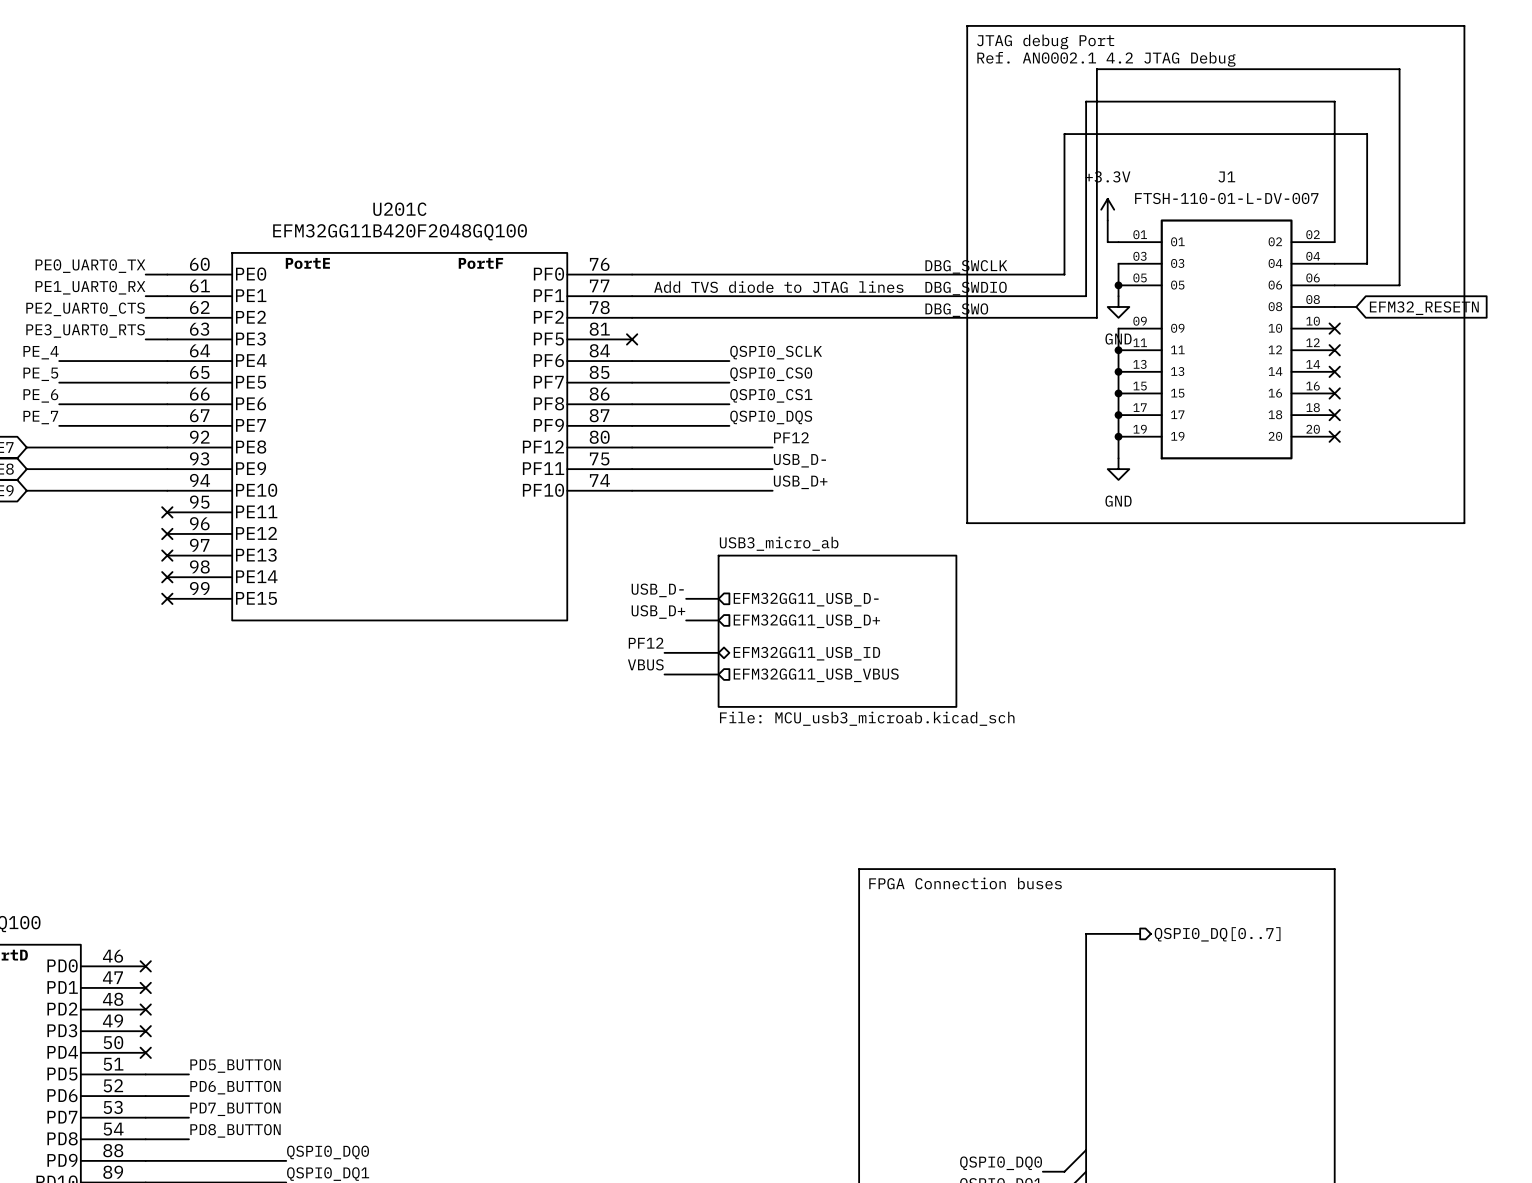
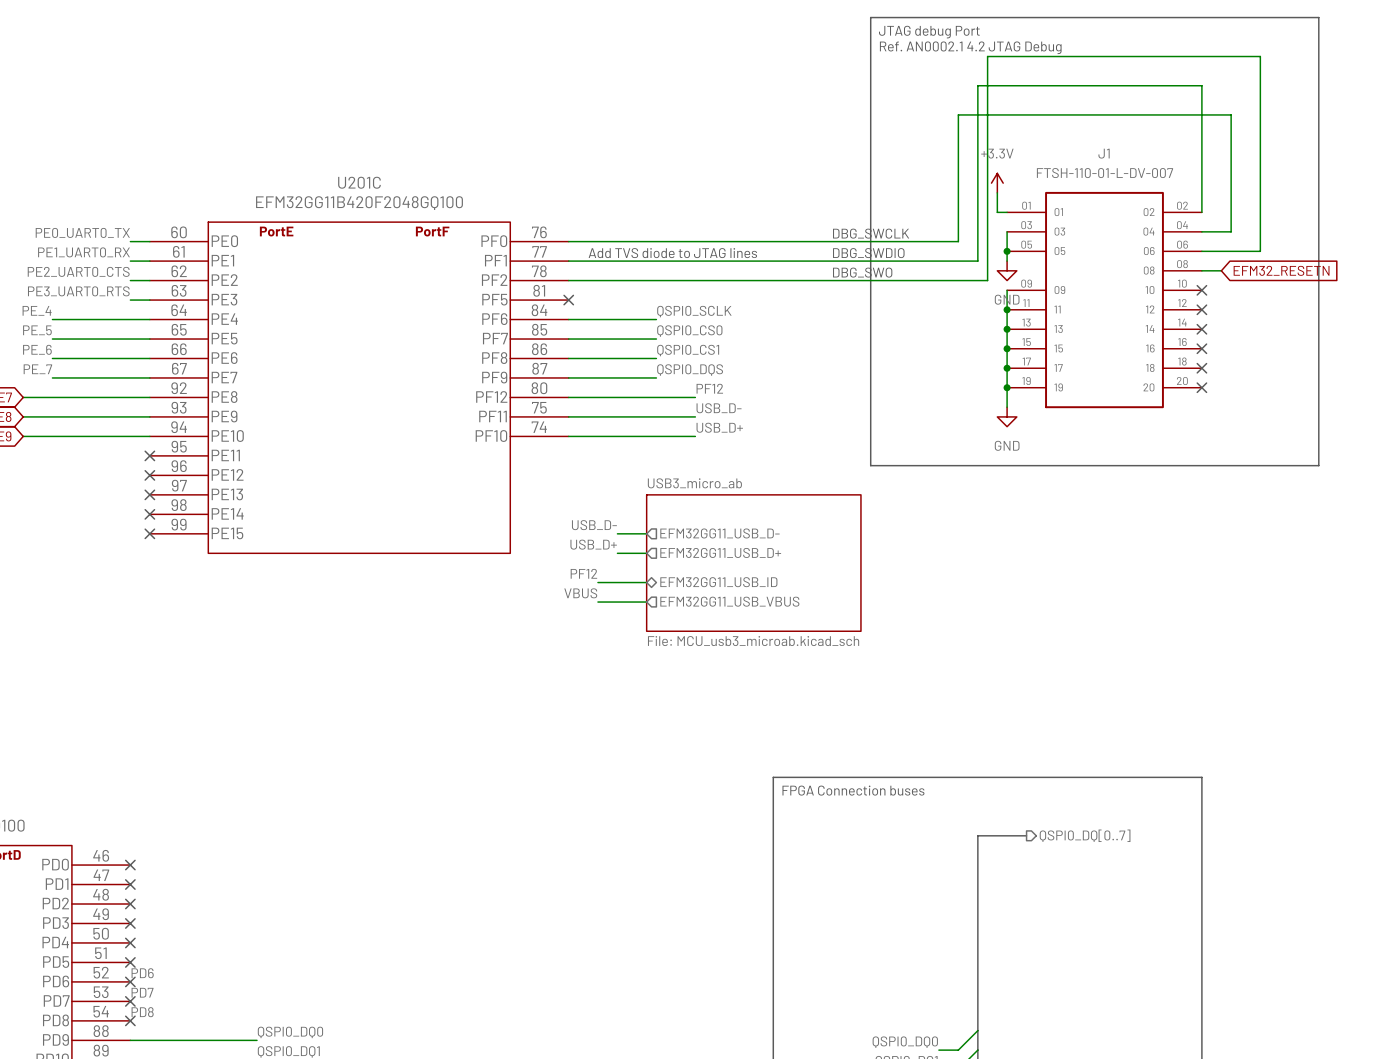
label: PD5_BUTTON (235, 1066) -> none
wire: (145, 1074) (188, 1074) -> none
no-connect mark: none -> (130, 962)
label: none -> PD6 (142, 973)
label: PD6_BUTTON (235, 1087) -> none
wire: (145, 1096) (188, 1096) -> none
no-connect mark: none -> (130, 981)
label: none -> PD7 (142, 992)
label: PD7_BUTTON (235, 1109) -> none
wire: (145, 1117) (188, 1117) -> none
no-connect mark: none -> (130, 1001)
label: none -> PD8 (142, 1012)
label: PD8_BUTTON (235, 1130) -> none
wire: (145, 1139) (188, 1139) -> none
no-connect mark: none -> (130, 1020)

